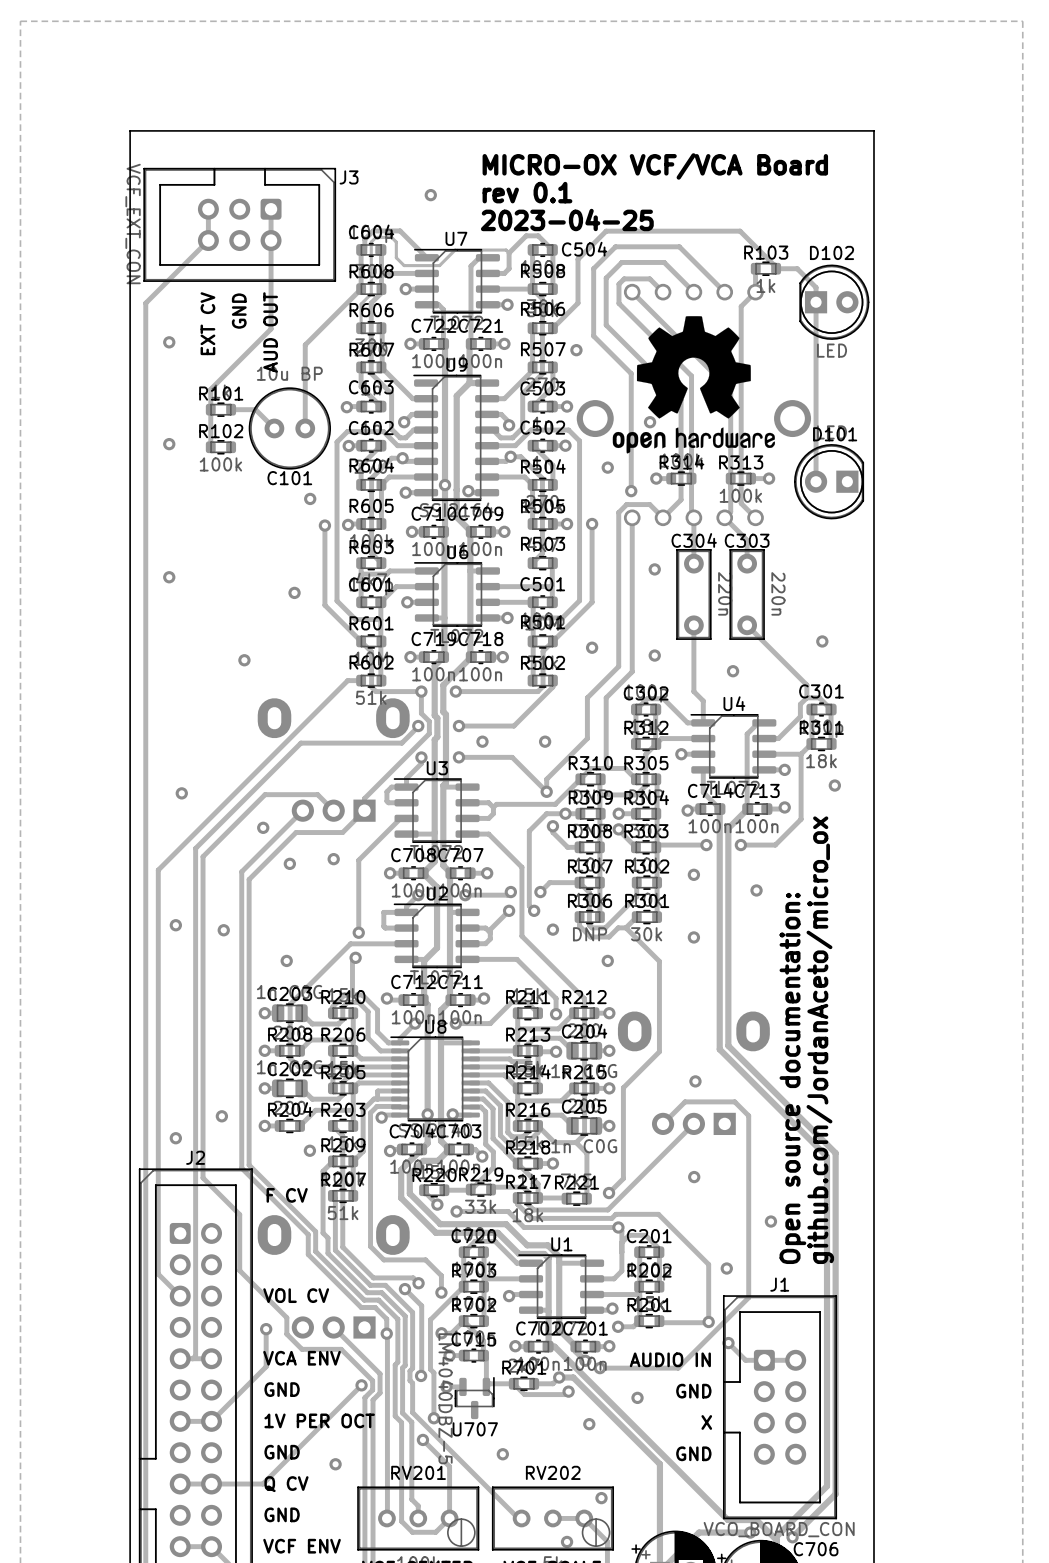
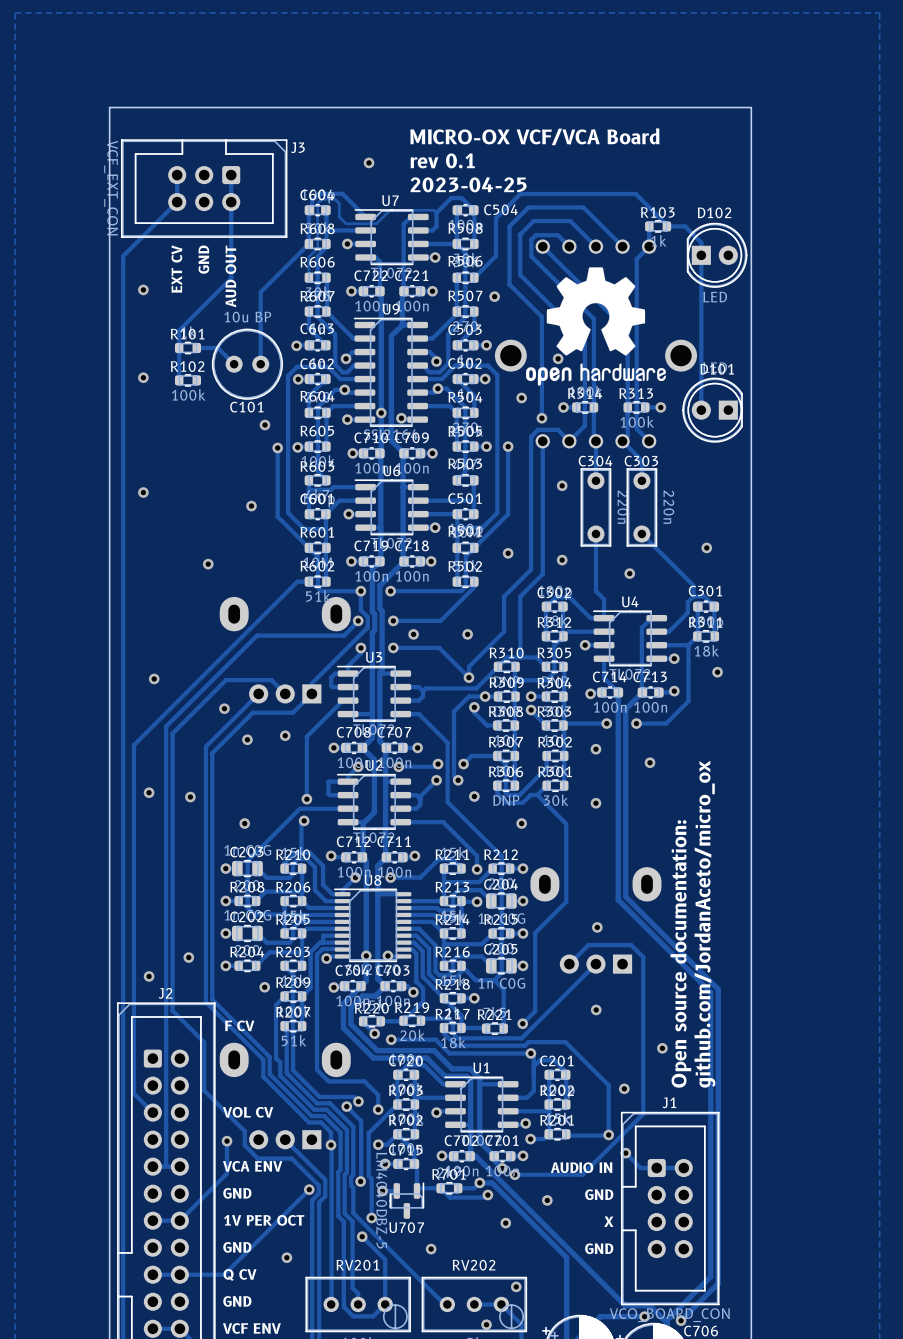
R219 value: 33k (480, 1206) -> 20k (412, 1035)

